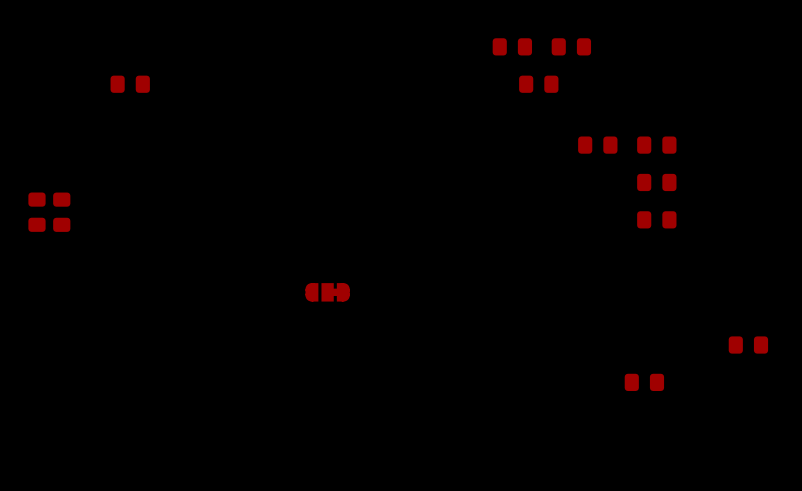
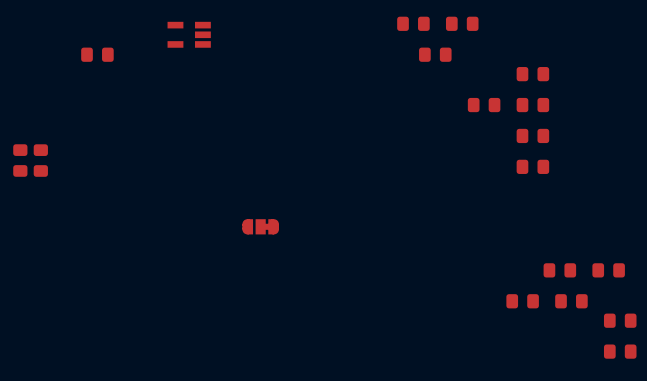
part: none -> (189, 34)
part: none -> (532, 74)
part: none -> (559, 270)
part: none -> (571, 301)
part: none -> (620, 320)
part: none -> (620, 351)

